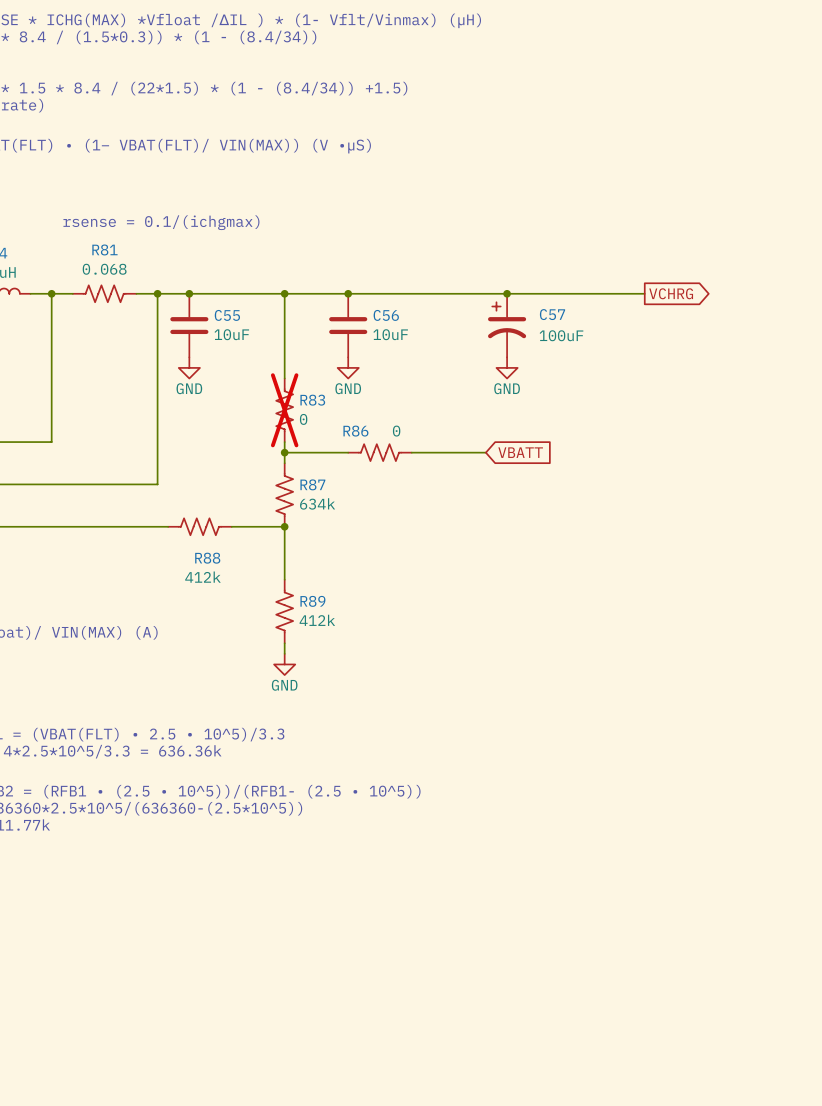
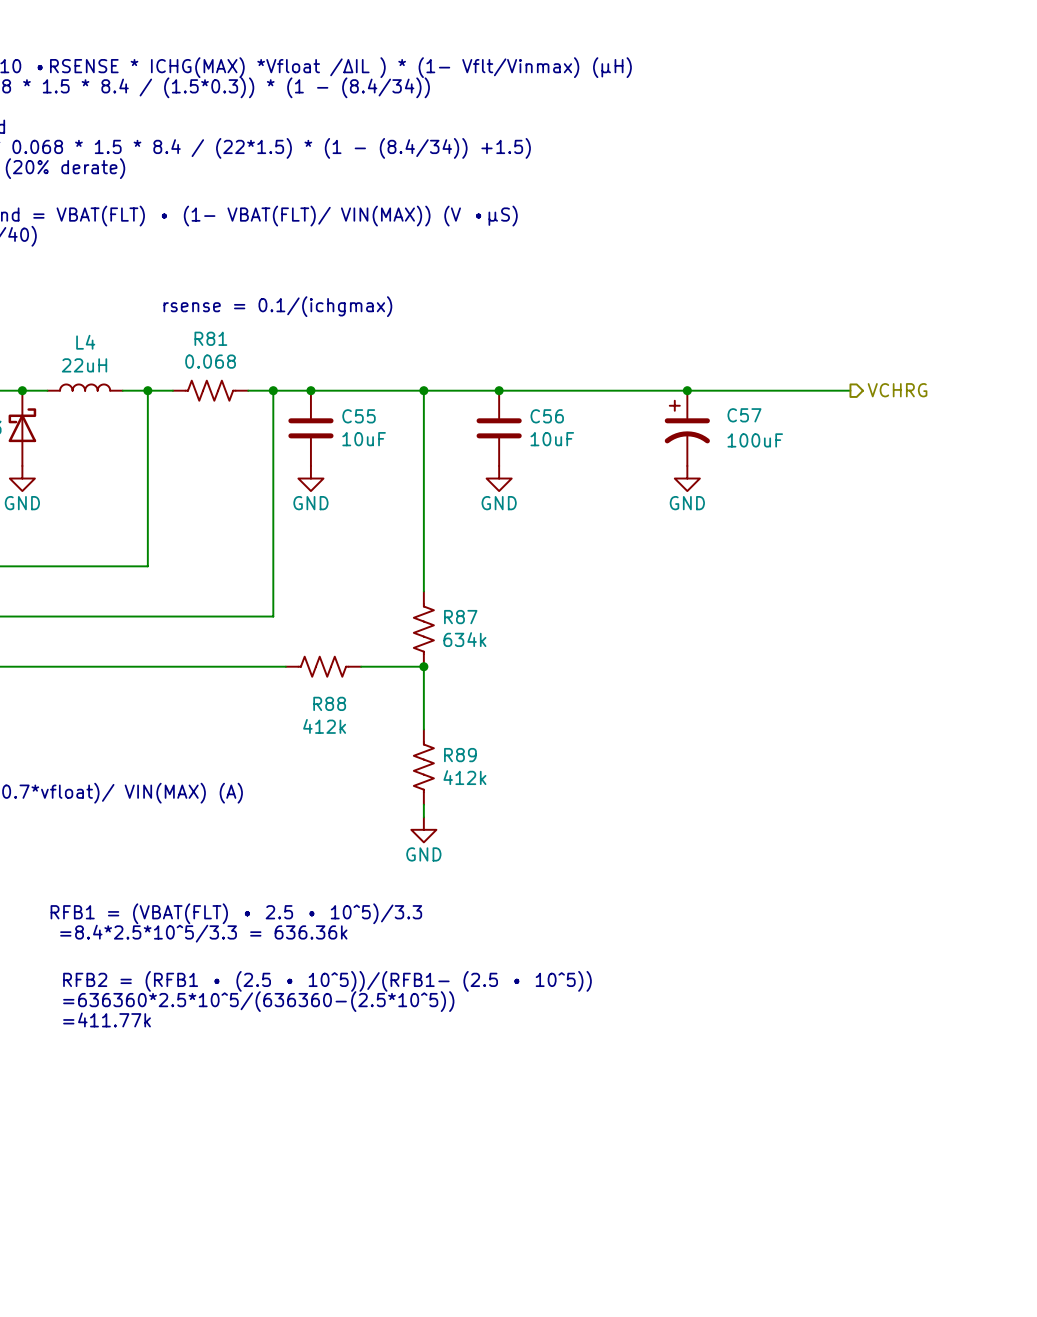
global label: VCHRG (671, 293) -> none
hierarchical label: none -> VCHRG (897, 390)
R83: 0 (284, 410) -> none
wire: (284, 452) (348, 452) -> none
junction: (284, 452) -> none
R86: 0 (379, 452) -> none
wire: (411, 452) (485, 452) -> none
global label: VBATT (520, 452) -> none

